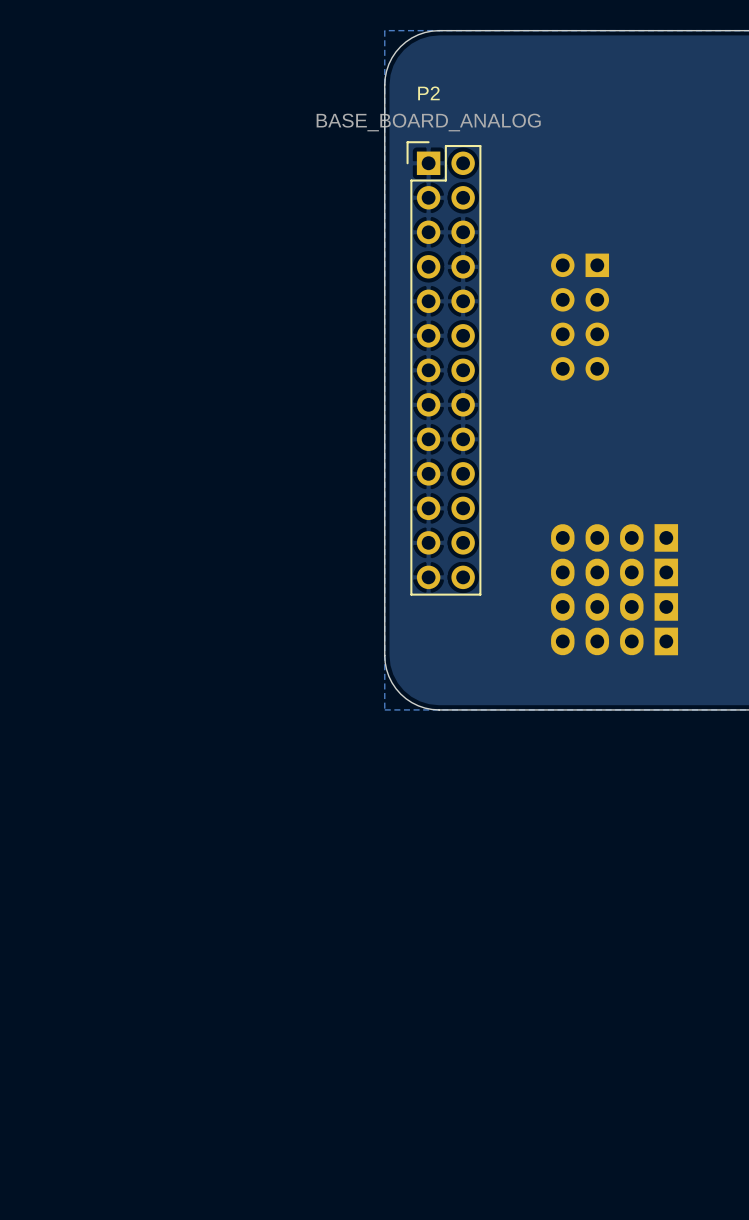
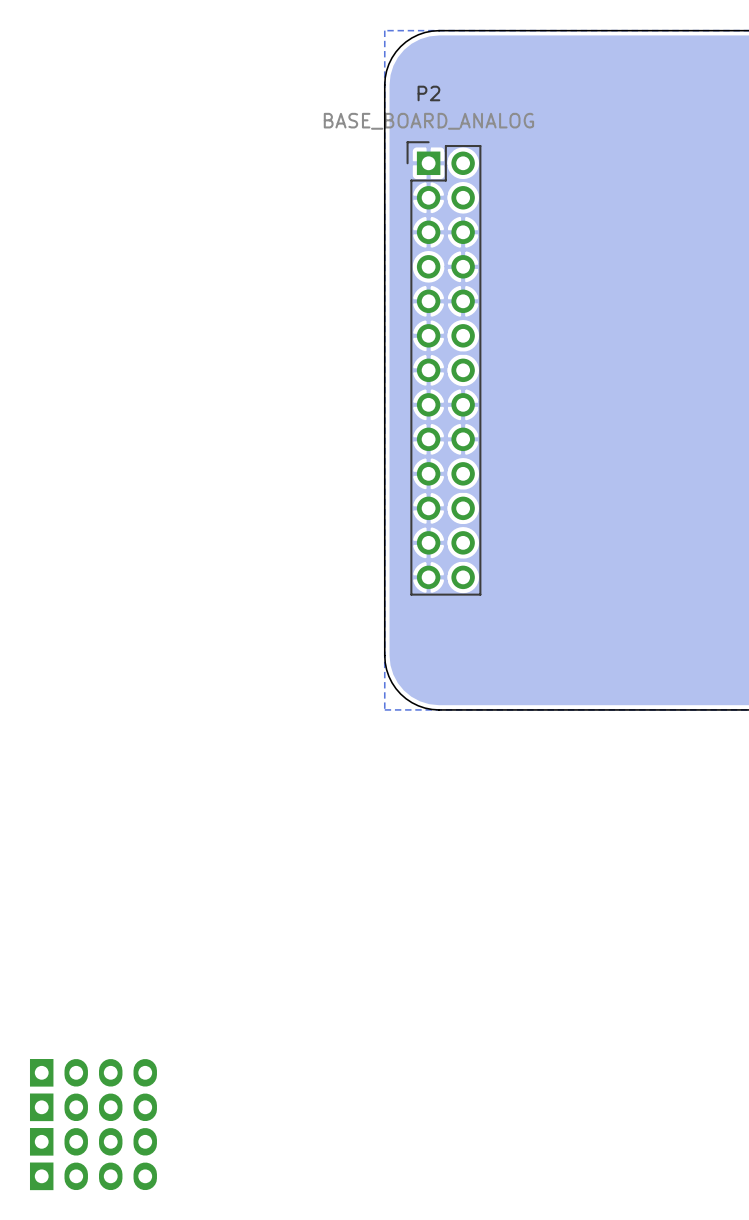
part: (580, 317) -> none
part: (614, 537) -> none
part: (614, 572) -> none
part: (614, 606) -> none
part: (614, 641) -> none
part: none -> (93, 1072)
part: none -> (93, 1107)
part: none -> (93, 1141)
part: none -> (93, 1176)

